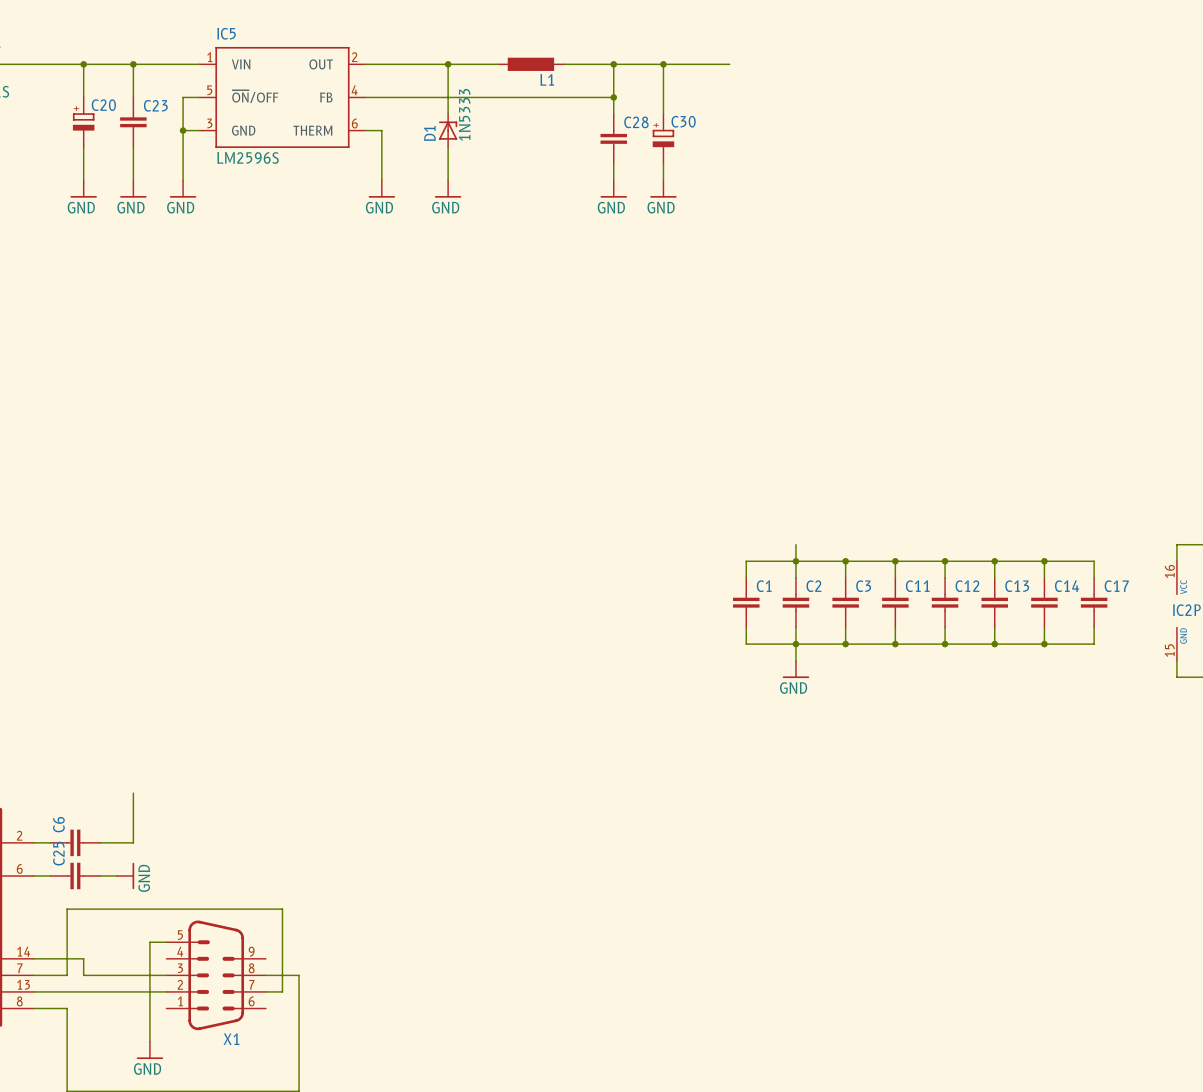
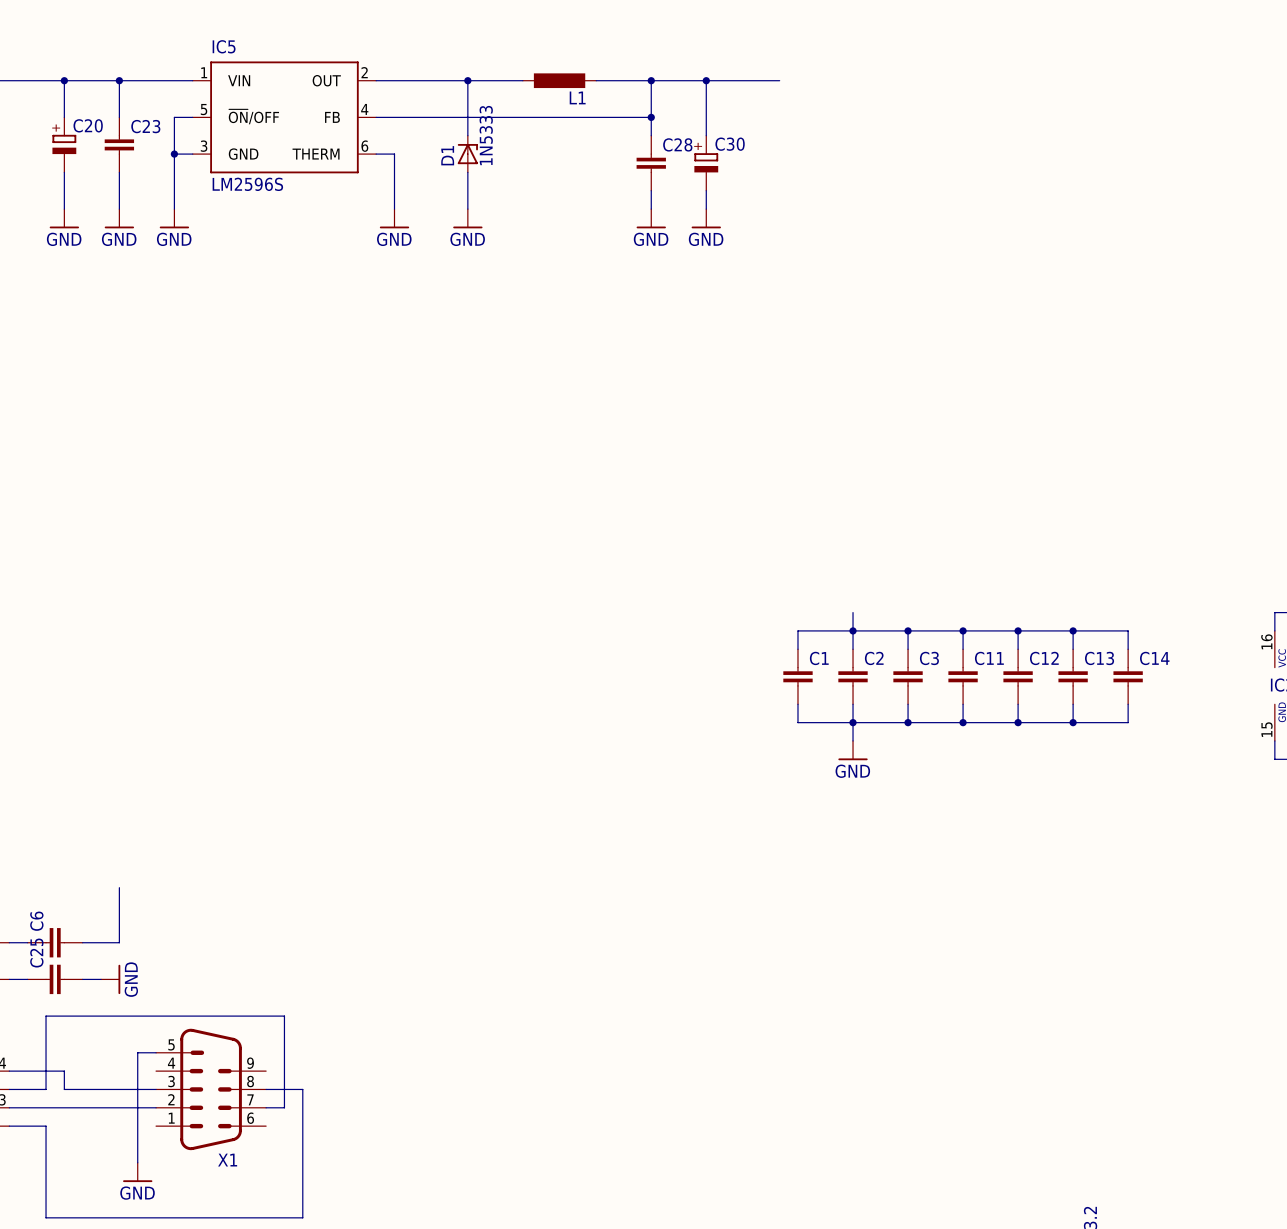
wire: (1044, 561) (1094, 561) (1094, 577) -> none
junction: (1044, 561) -> none
C17: (1094, 602) -> none
wire: (1094, 627) (1094, 644) (1044, 644) -> none
junction: (1044, 644) -> none

